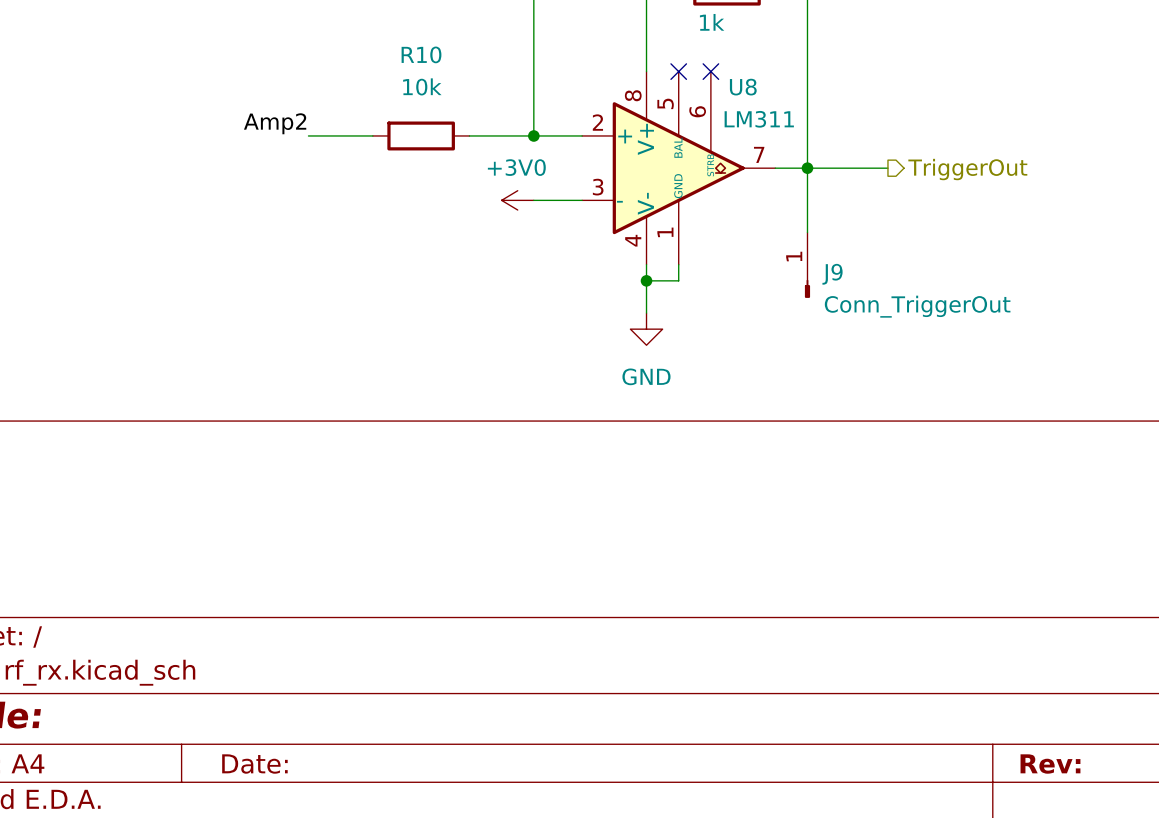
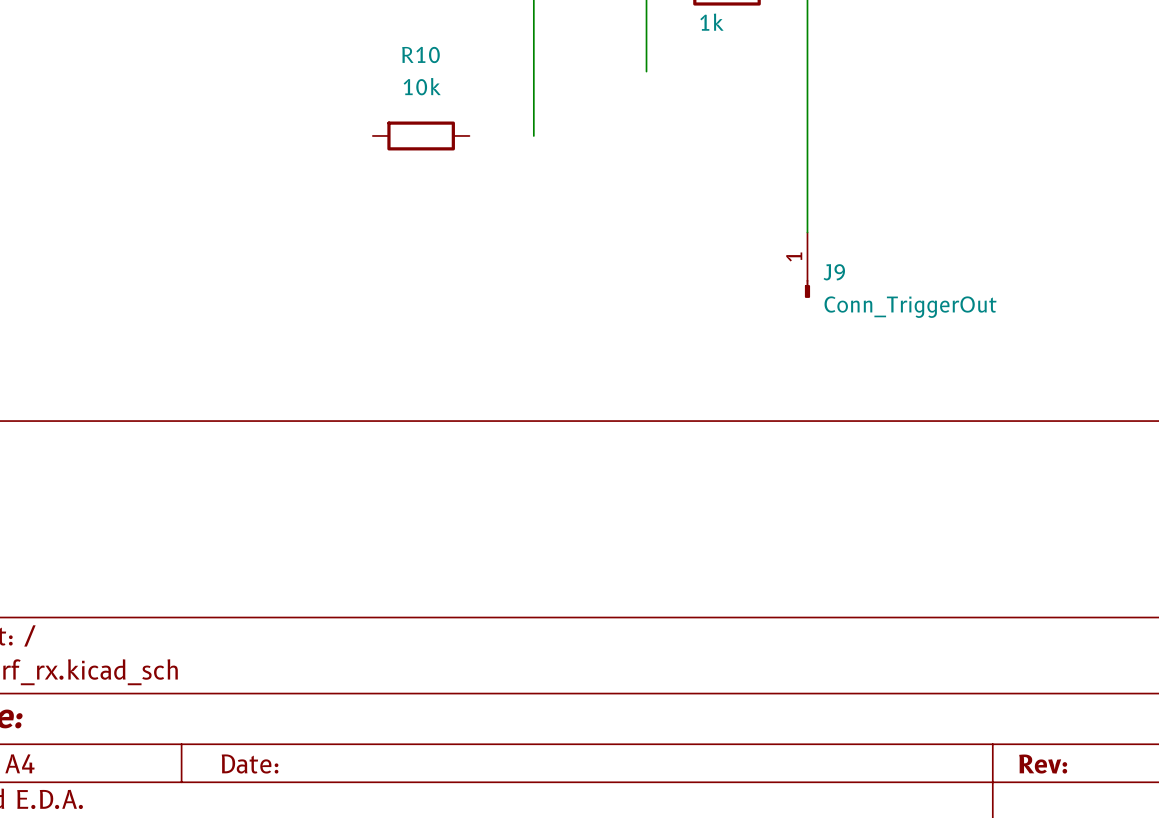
no-connect mark: (678, 71) -> none
no-connect mark: (710, 71) -> none
label: Amp2 (275, 123) -> none
wire: (308, 135) (372, 135) -> none
wire: (469, 135) (582, 135) -> none
junction: (533, 135) -> none
U8: LM311 (678, 168) -> none
wire: (775, 168) (887, 168) -> none
junction: (807, 168) -> none
hierarchical label: TriggerOut (967, 169) -> none
power symbol: +3V0 (517, 200) -> none
wire: (533, 200) (582, 200) -> none
wire: (646, 264) (646, 313) -> none
wire: (678, 264) (678, 280) (646, 280) -> none
junction: (646, 280) -> none
power symbol: GND (646, 329) -> none

